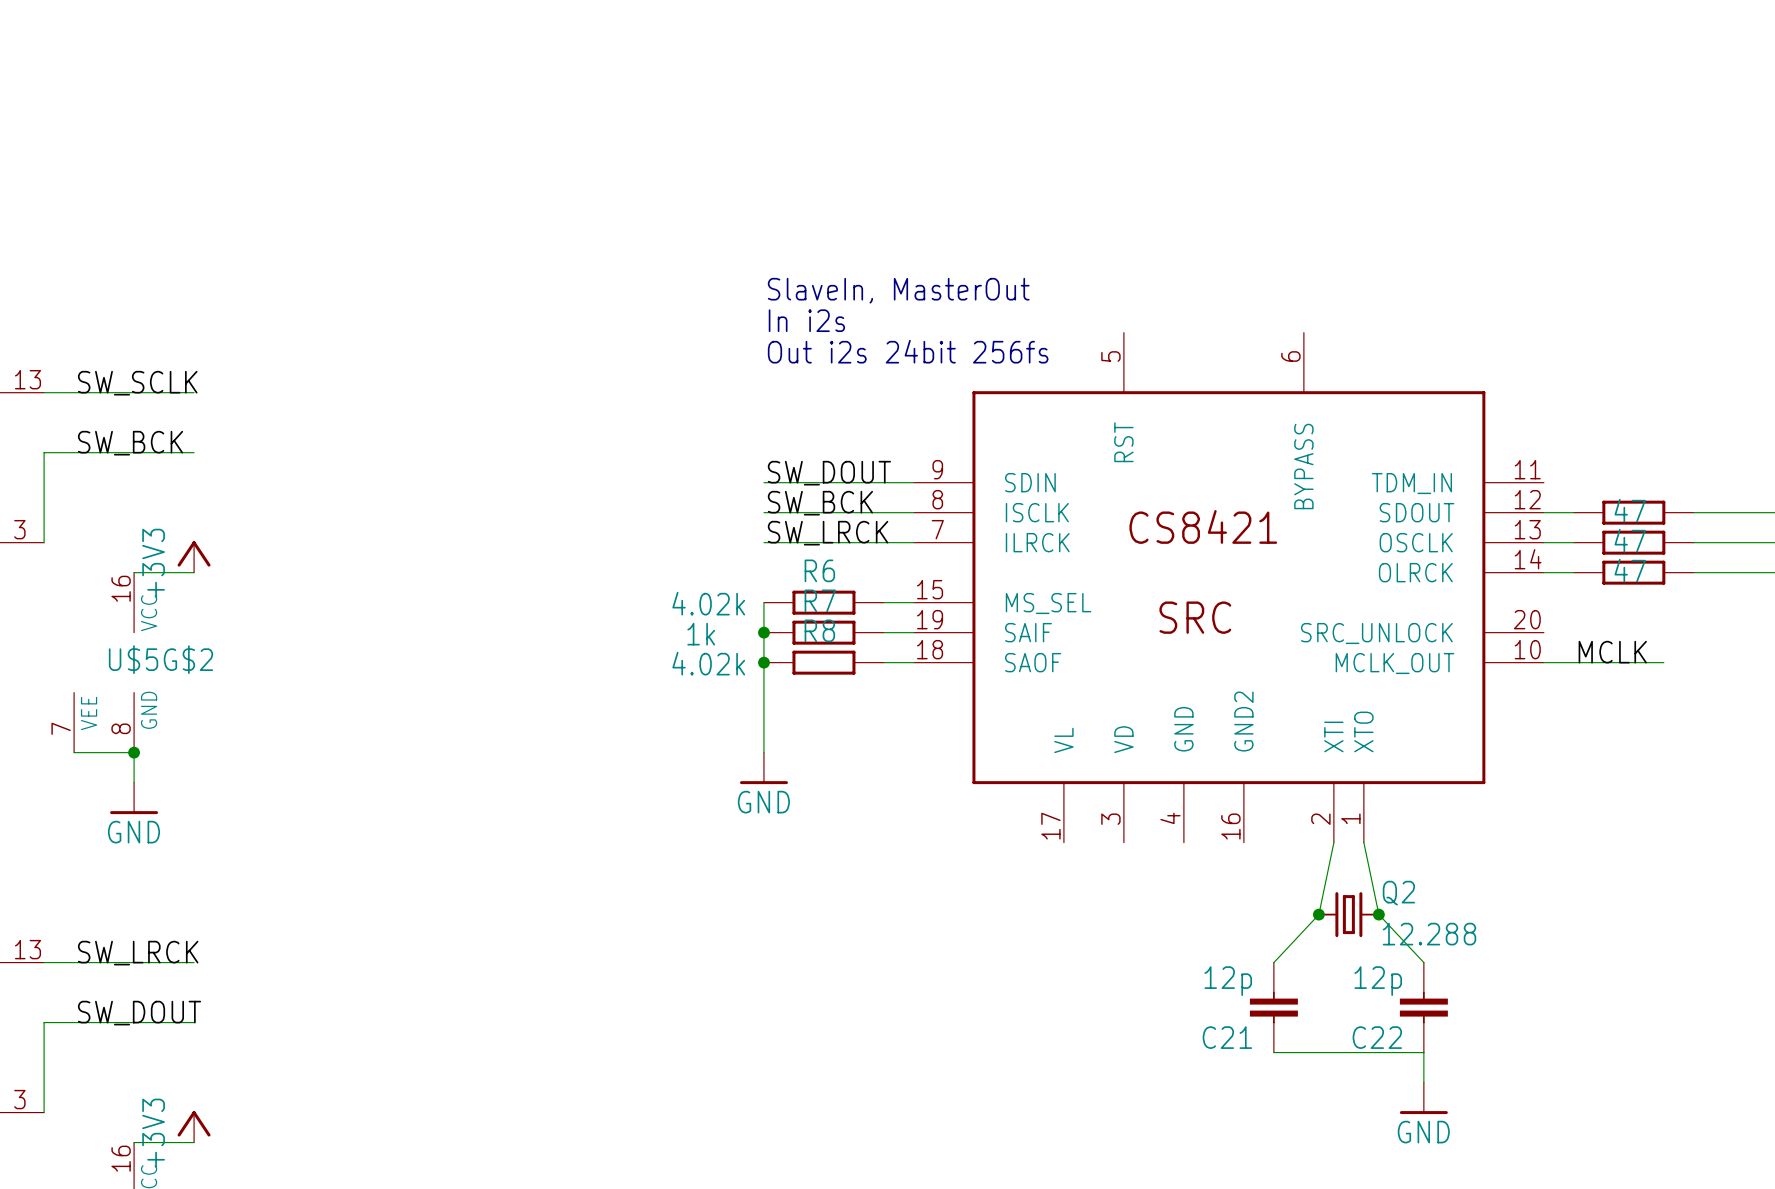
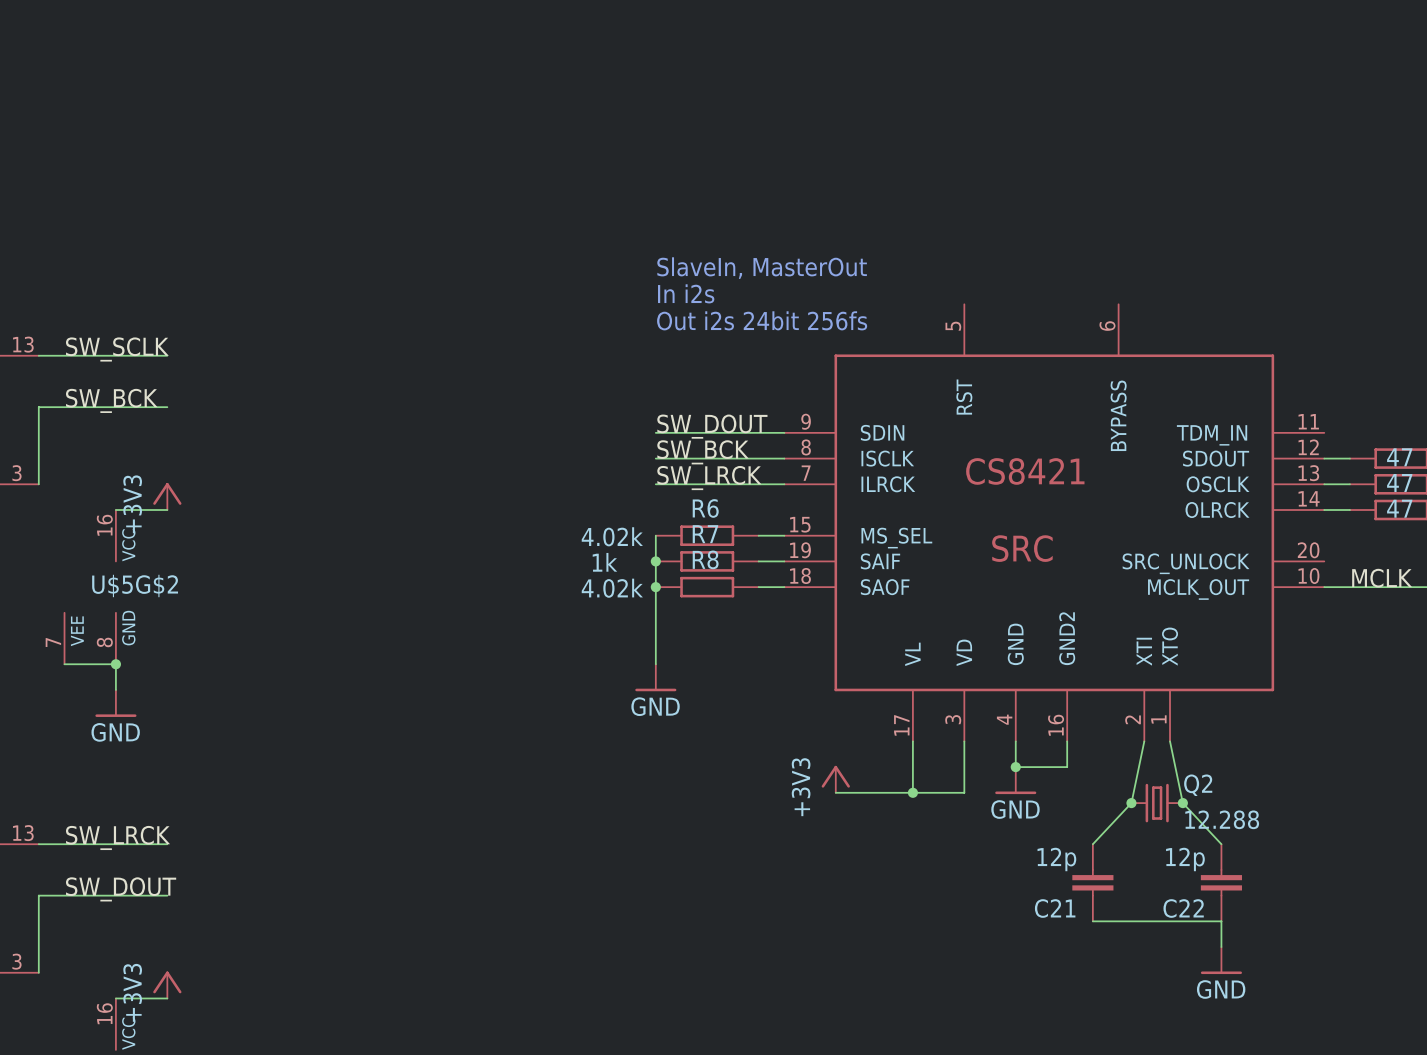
wire: none -> (912, 741) (912, 792)
wire: none -> (964, 741) (964, 792) (835, 792)
wire: none -> (1015, 741) (1015, 767) (1067, 767) (1067, 741)
junction: none -> (1015, 767)
power symbol: none -> +3V3 (835, 779)
power symbol: none -> GND (1015, 780)
junction: none -> (912, 792)

